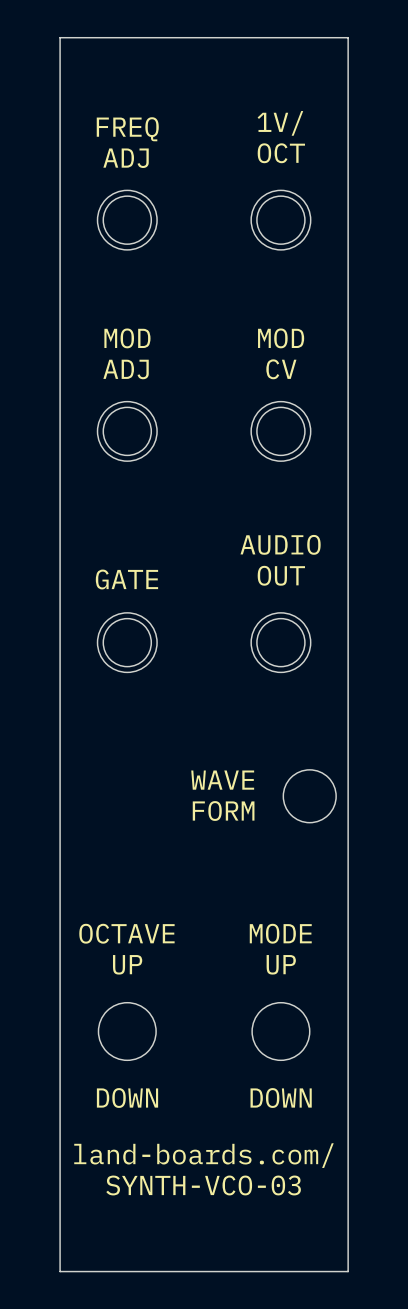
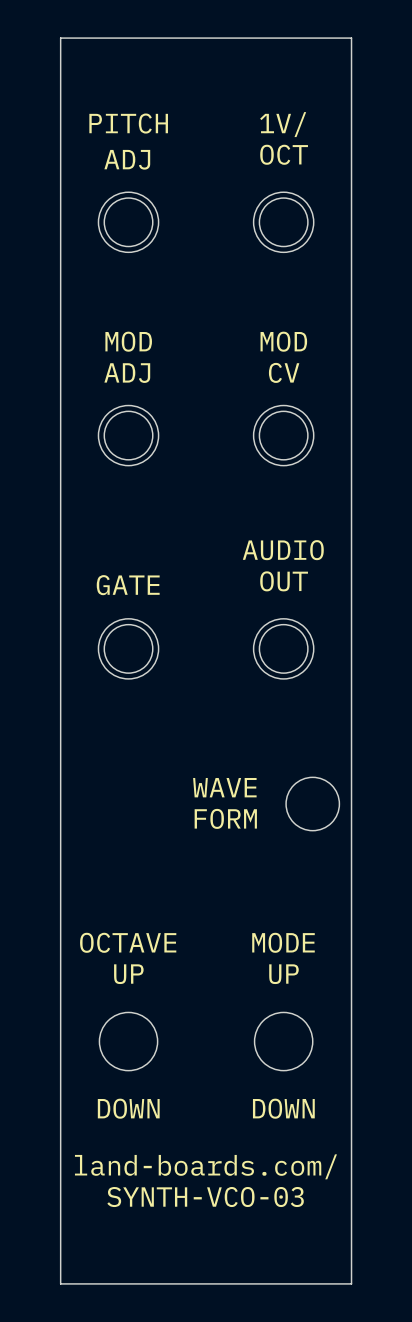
text: FREQ (127, 129) -> PITCH (128, 123)

